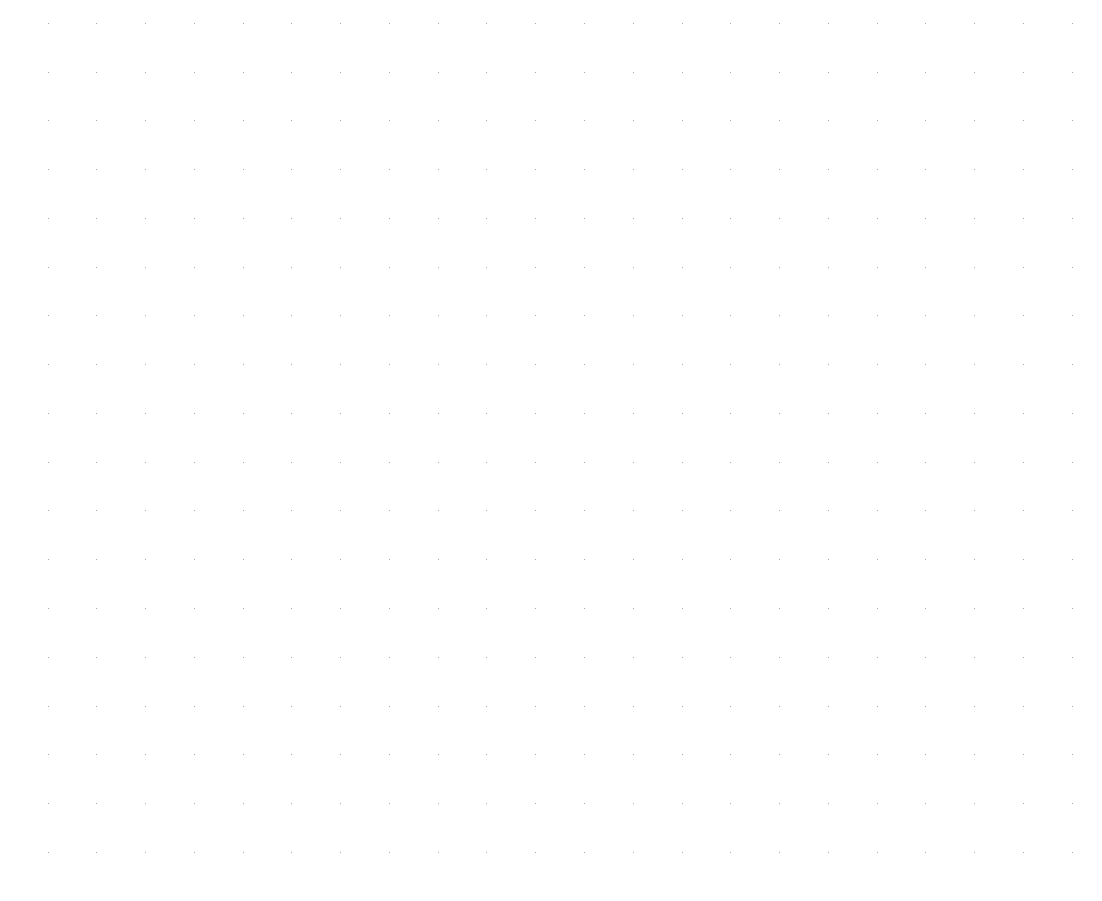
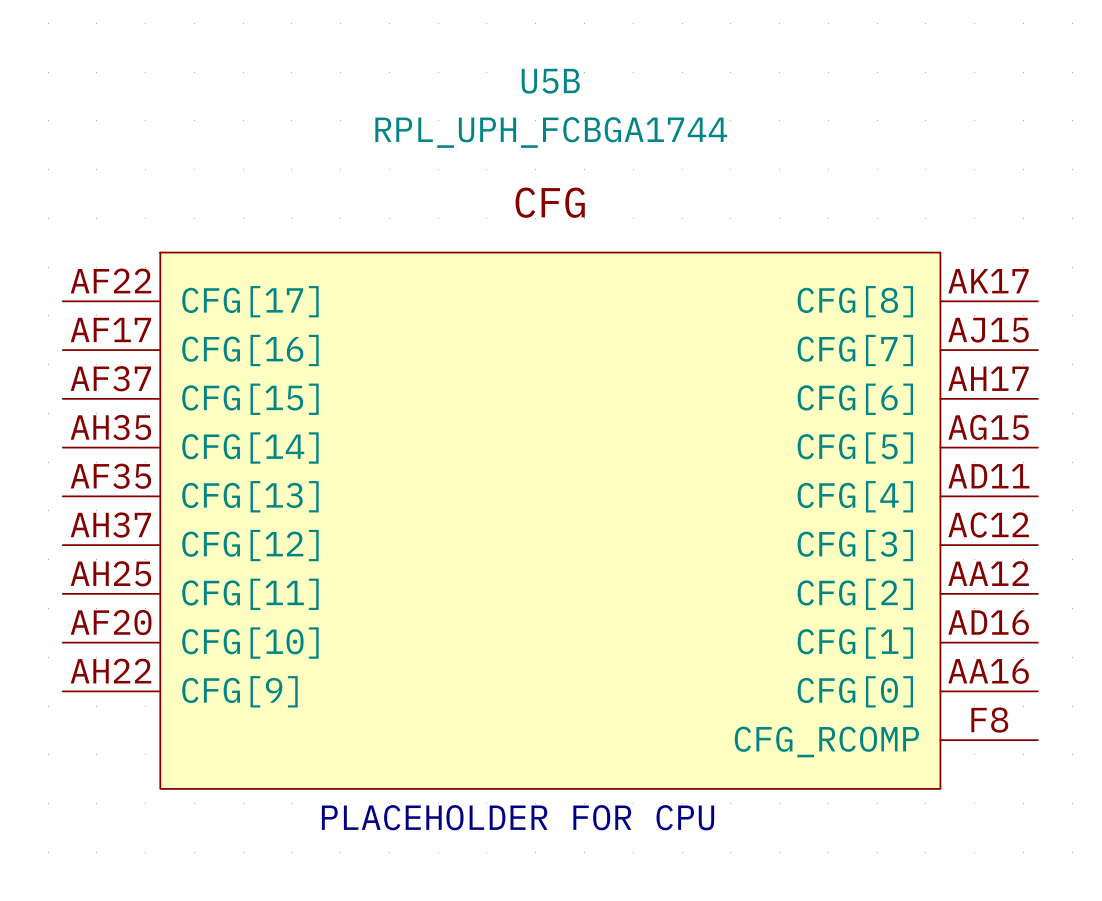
U5B: none -> RPL_UPH_FCBGA1744 (550, 520)
text: none -> PLACEHOLDER FOR CPU (518, 817)

